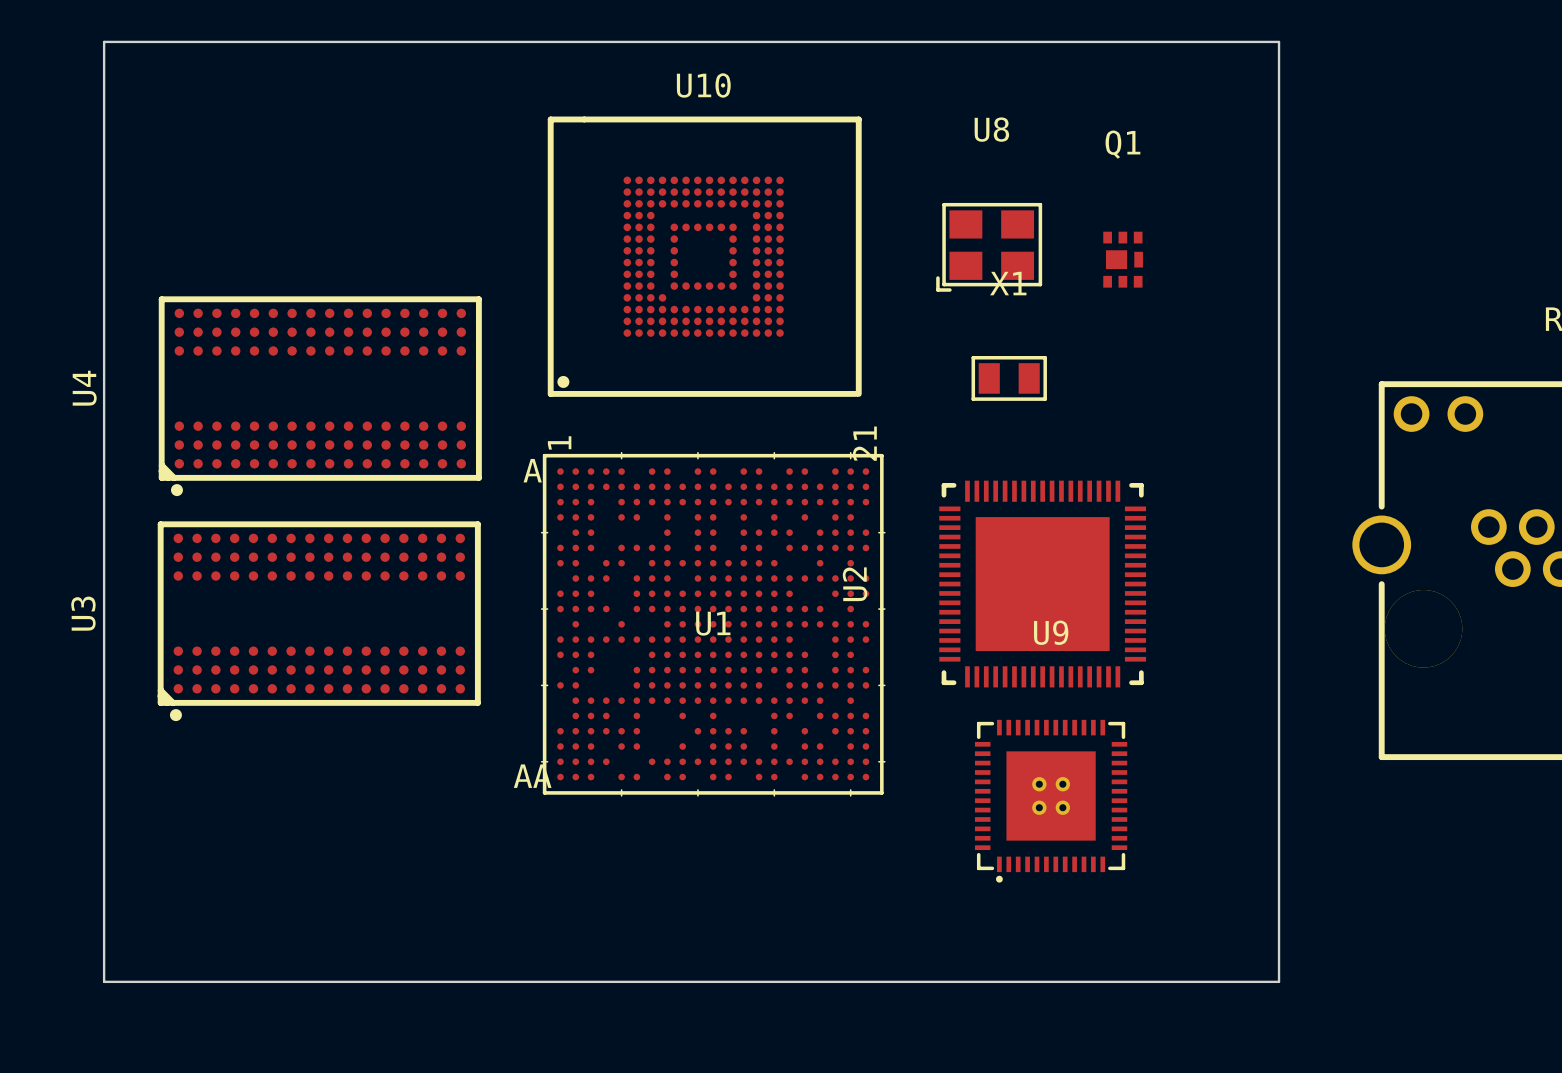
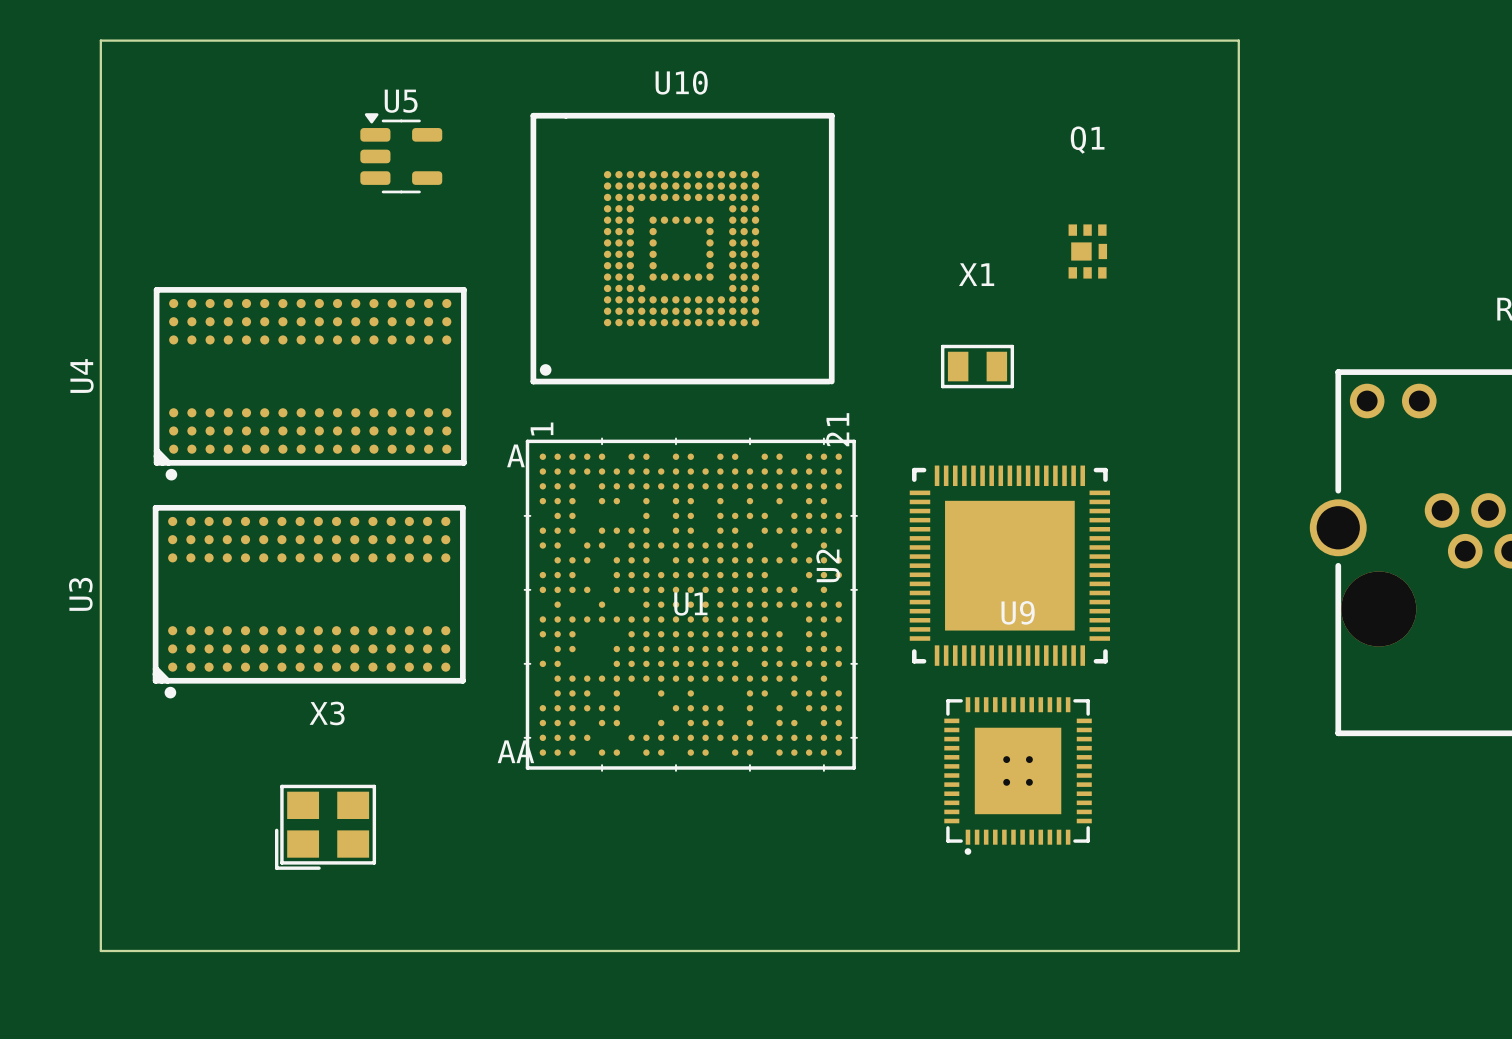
U5: none -> (401, 153)
U8: (989, 247) -> none
X3: none -> (325, 827)

